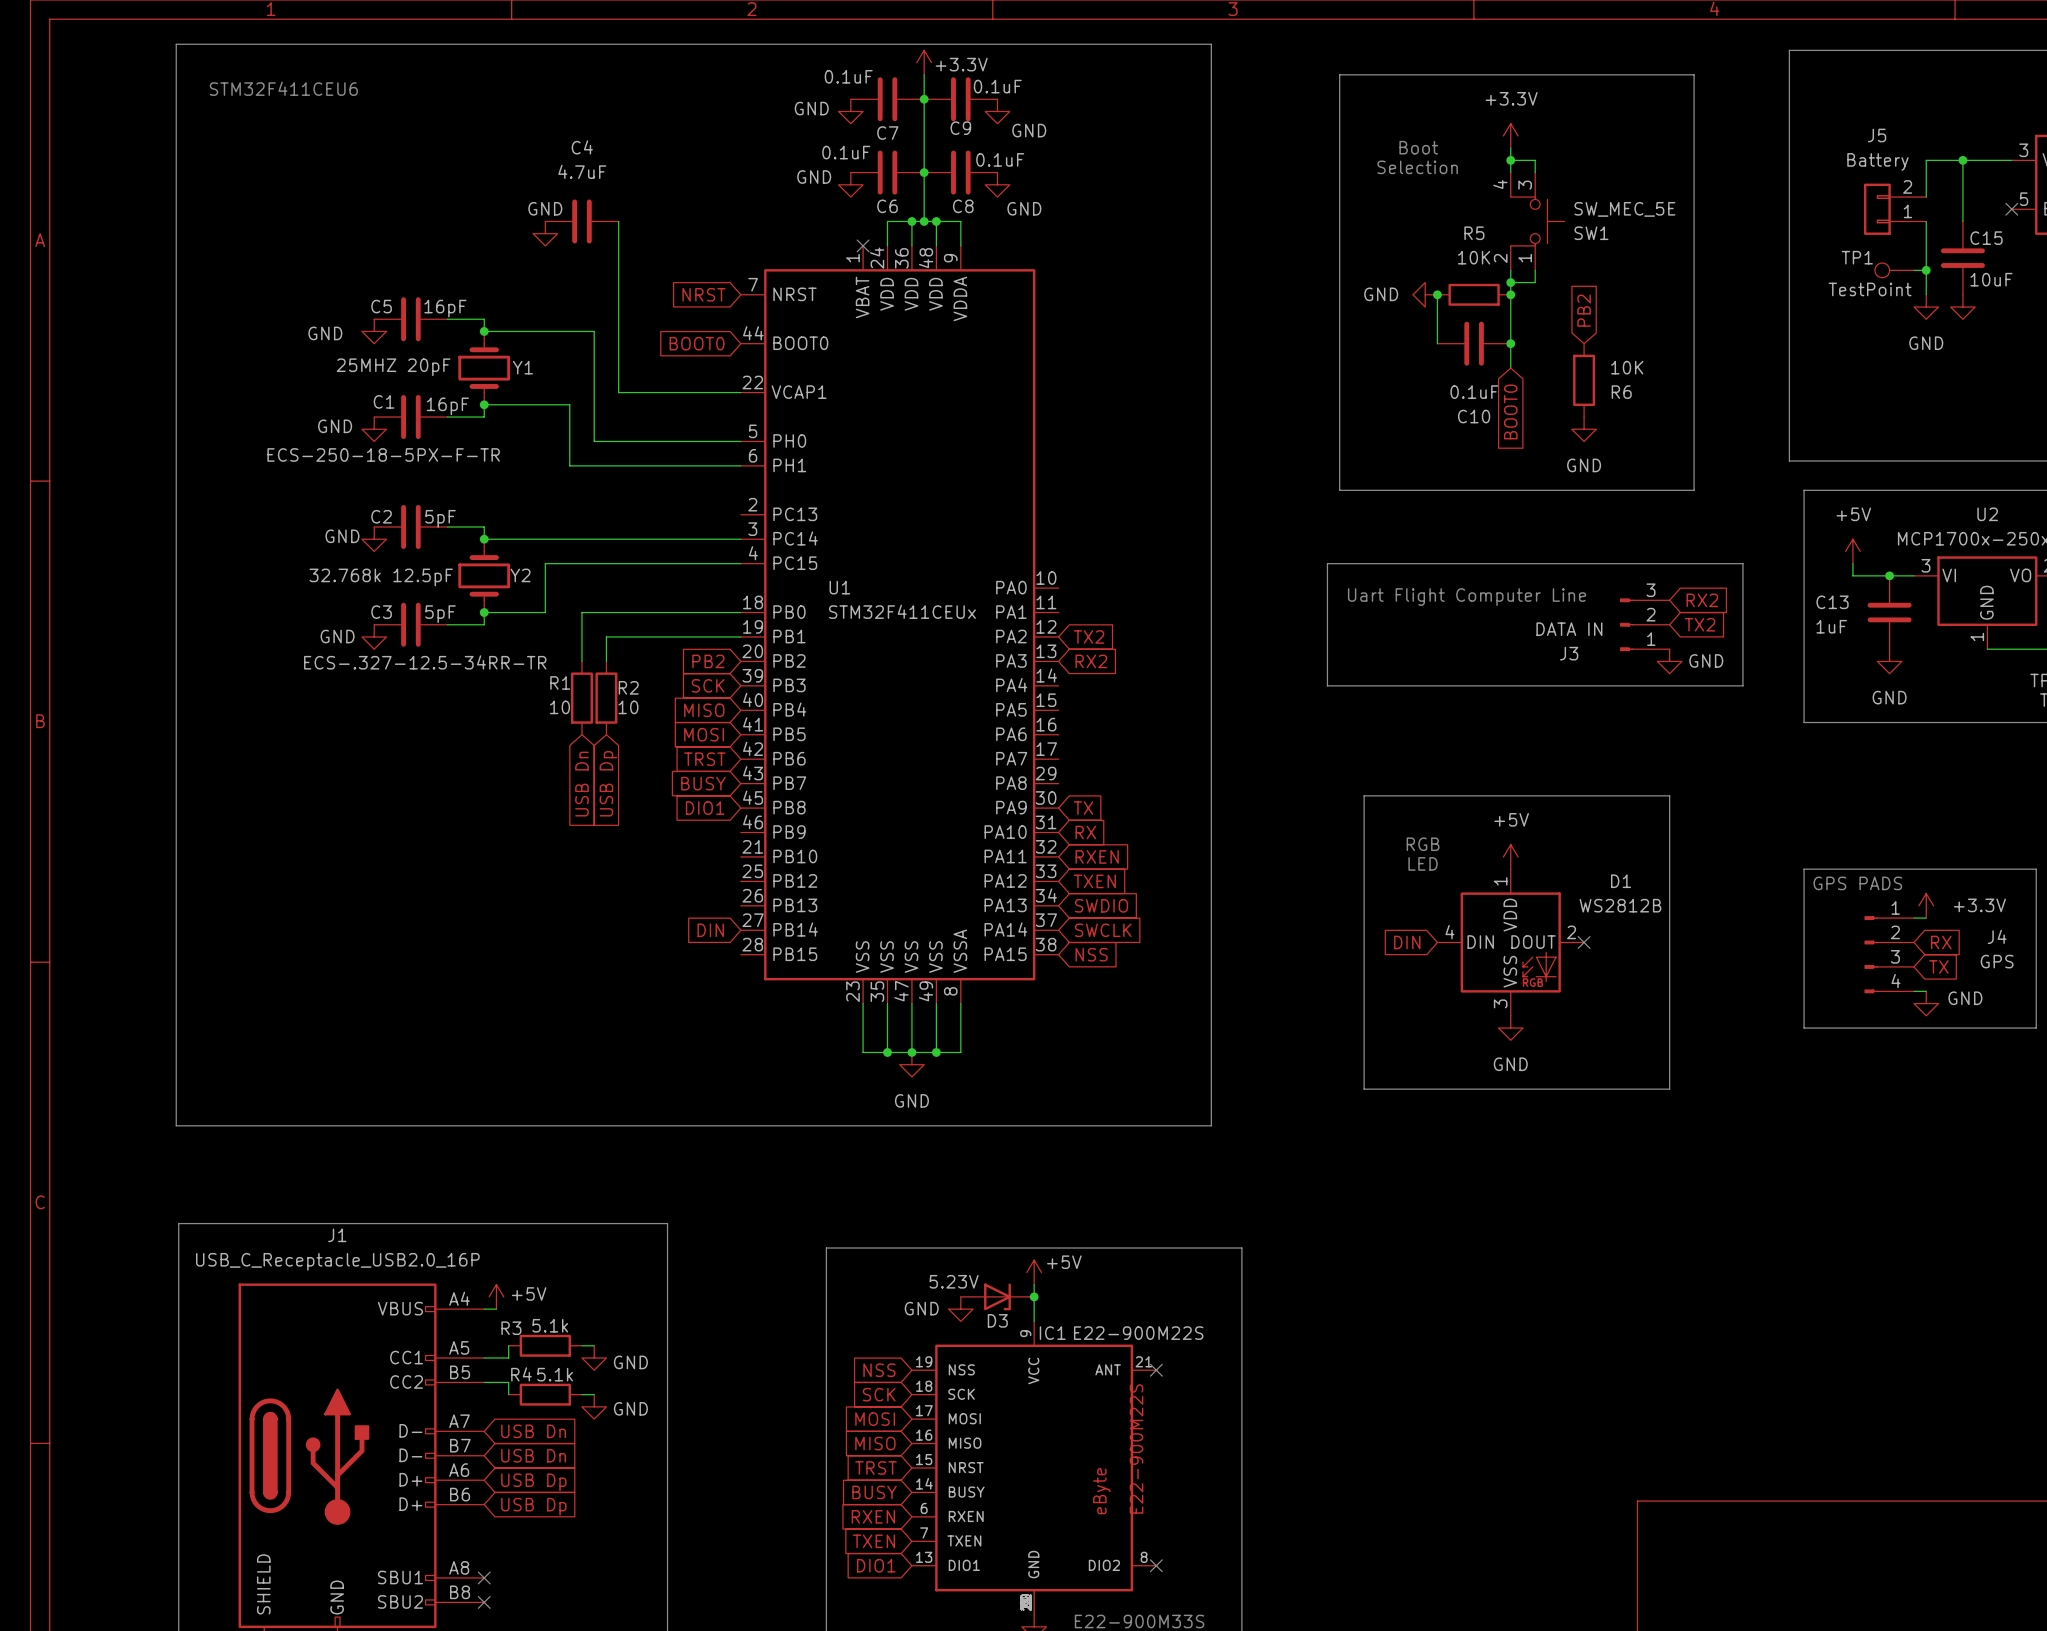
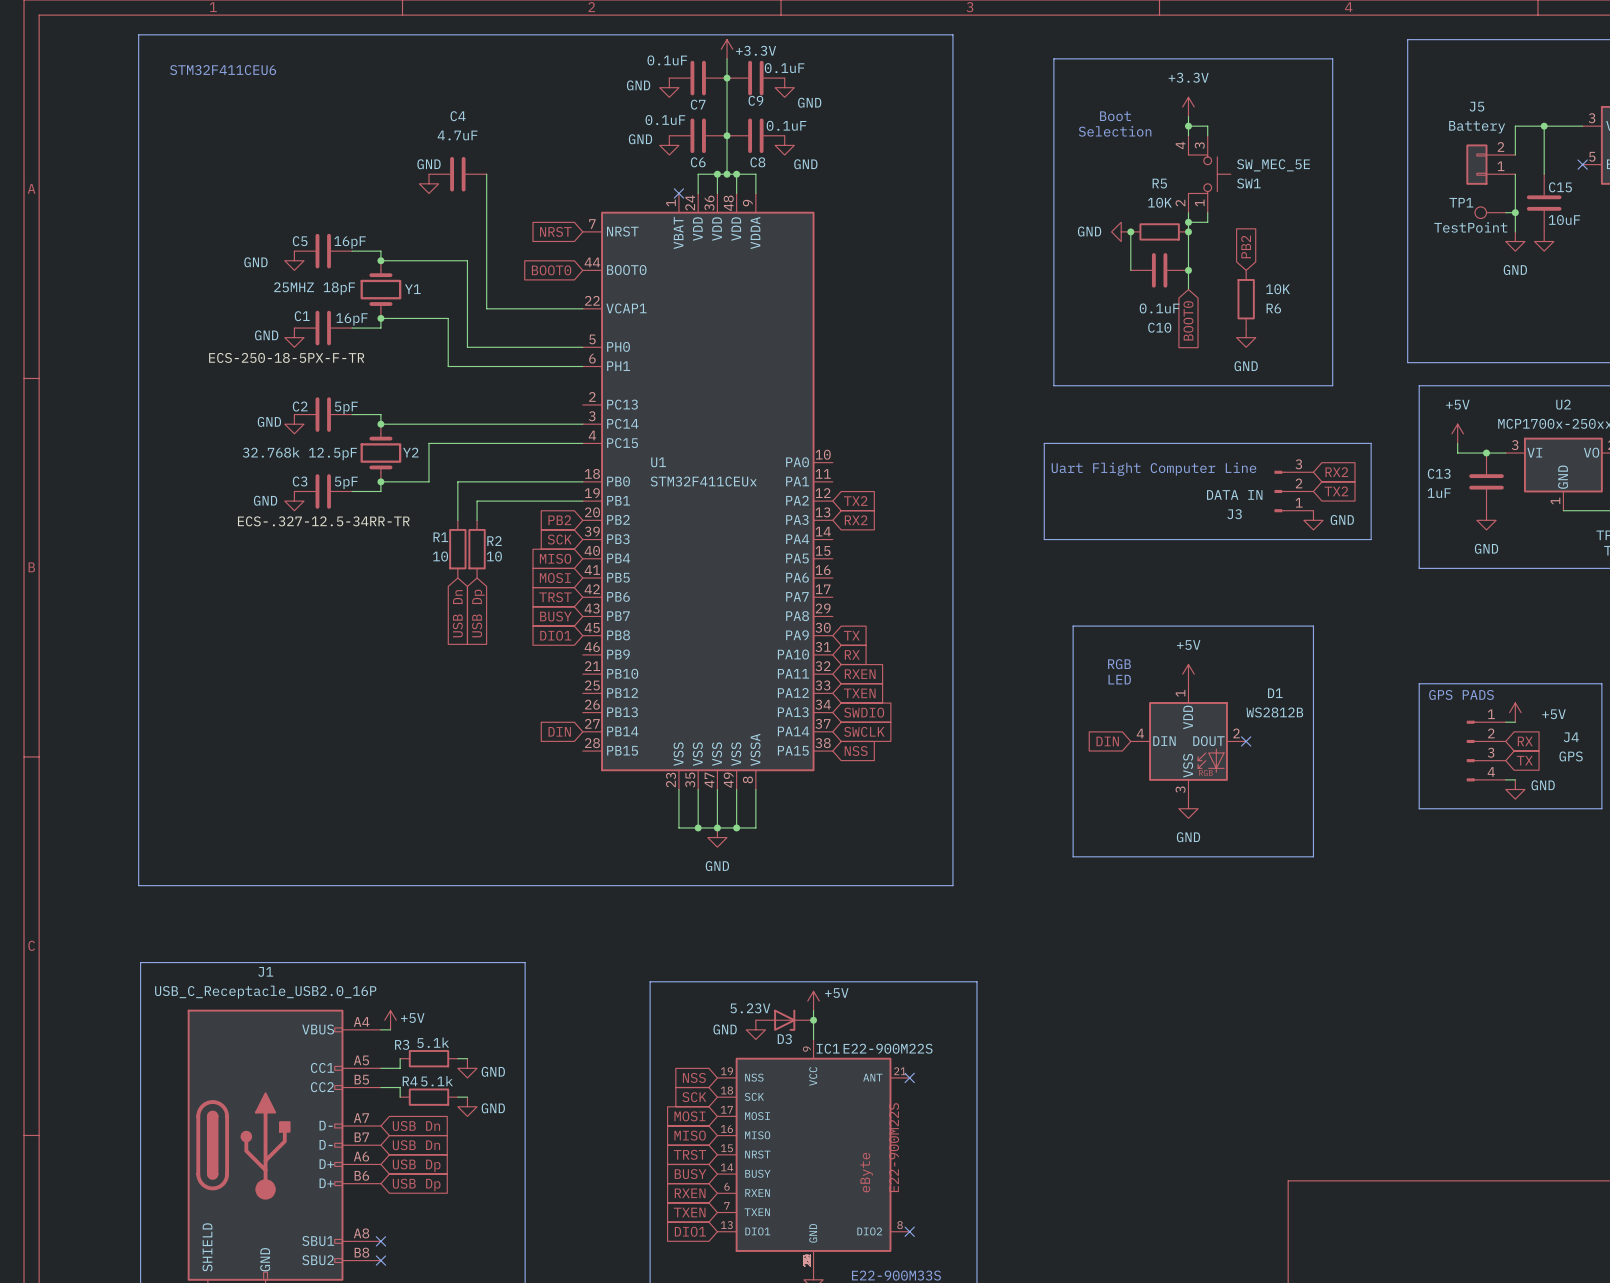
Y1 value: 25MHZ 20pF (393, 367) -> 25MHZ 18pF (314, 288)
power symbol: +3.3V (1926, 905) -> +5V (1515, 712)

